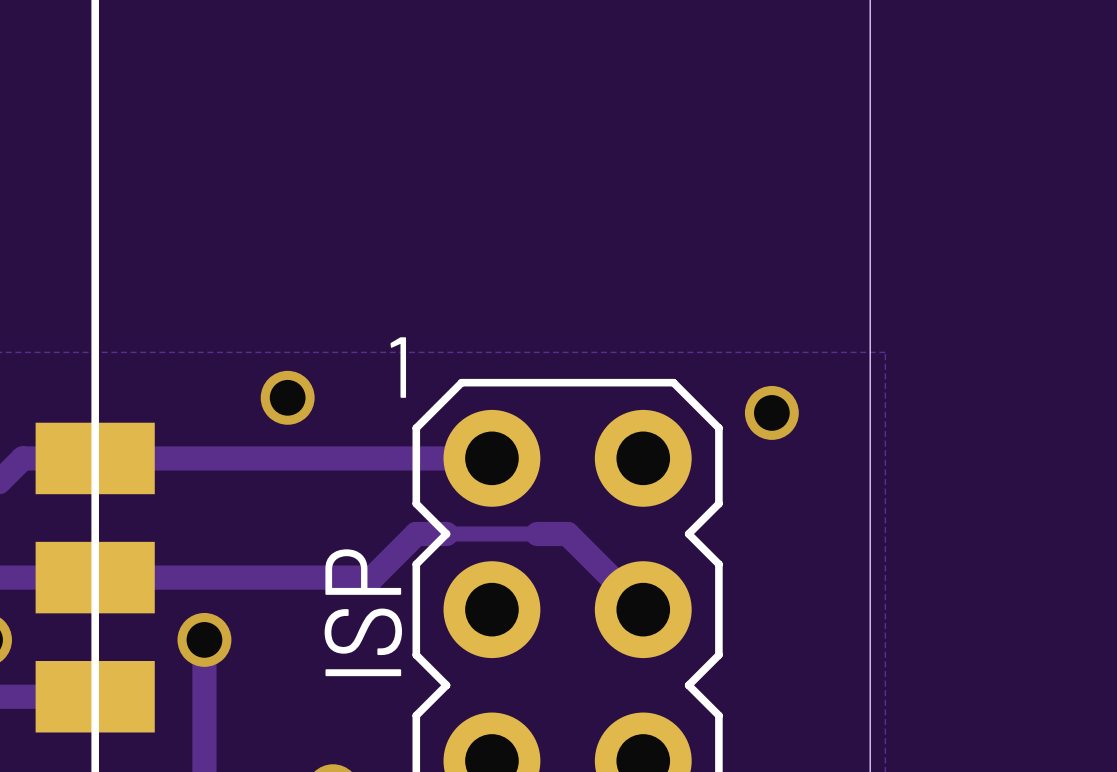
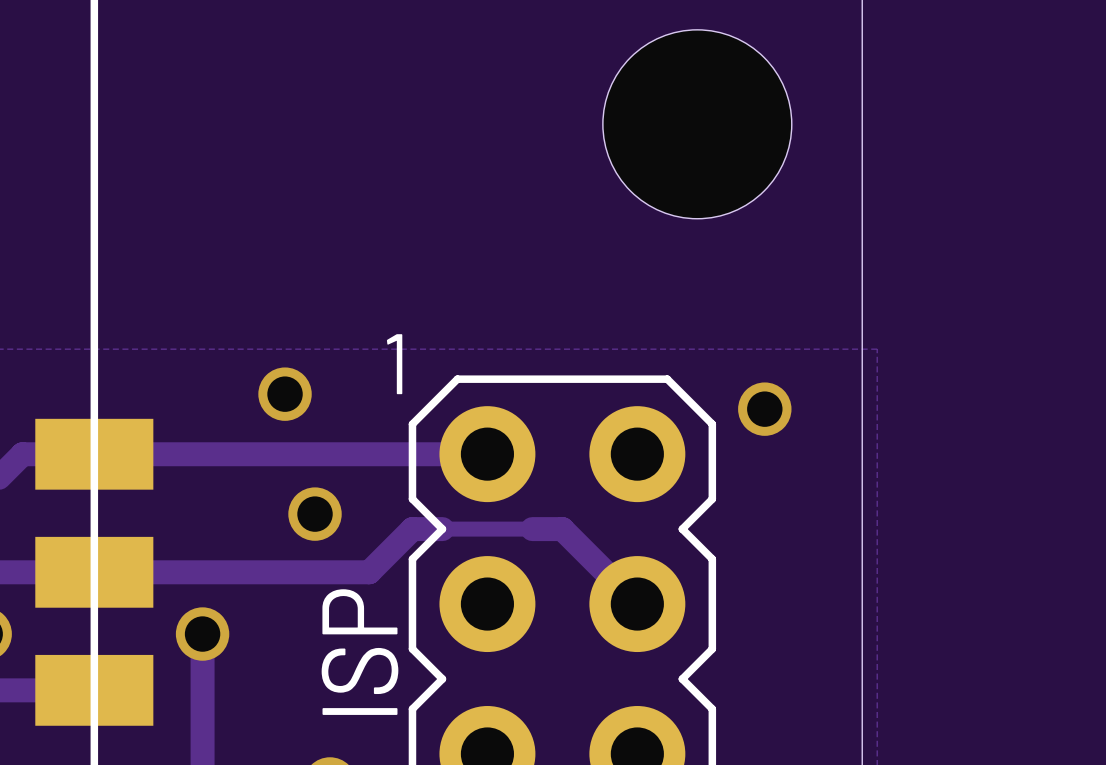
hole: none -> (697, 124)
via: none -> (315, 514)
ISP name position: ISP (363, 612) -> ISP (359, 652)

